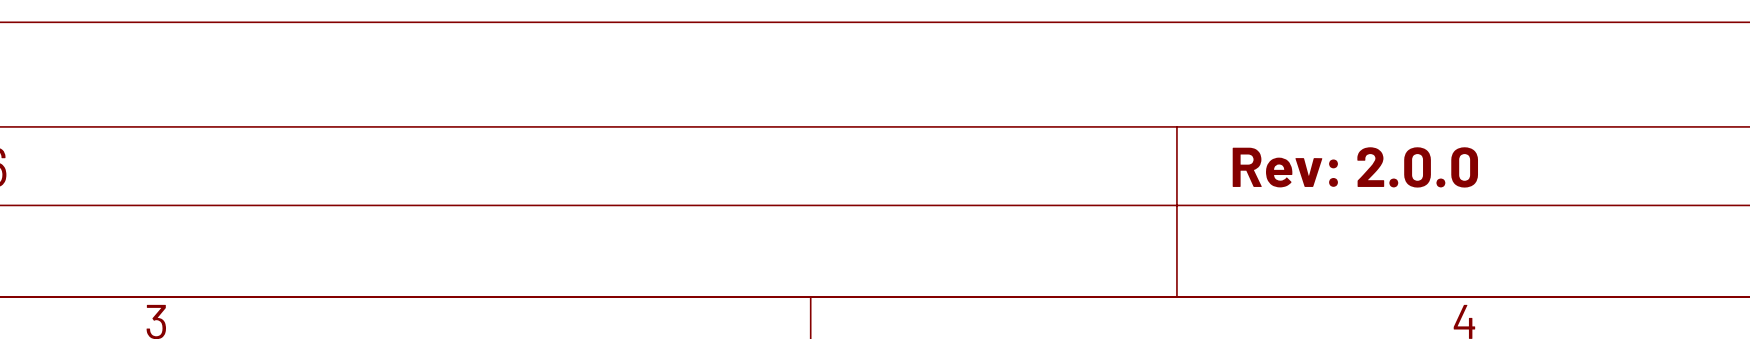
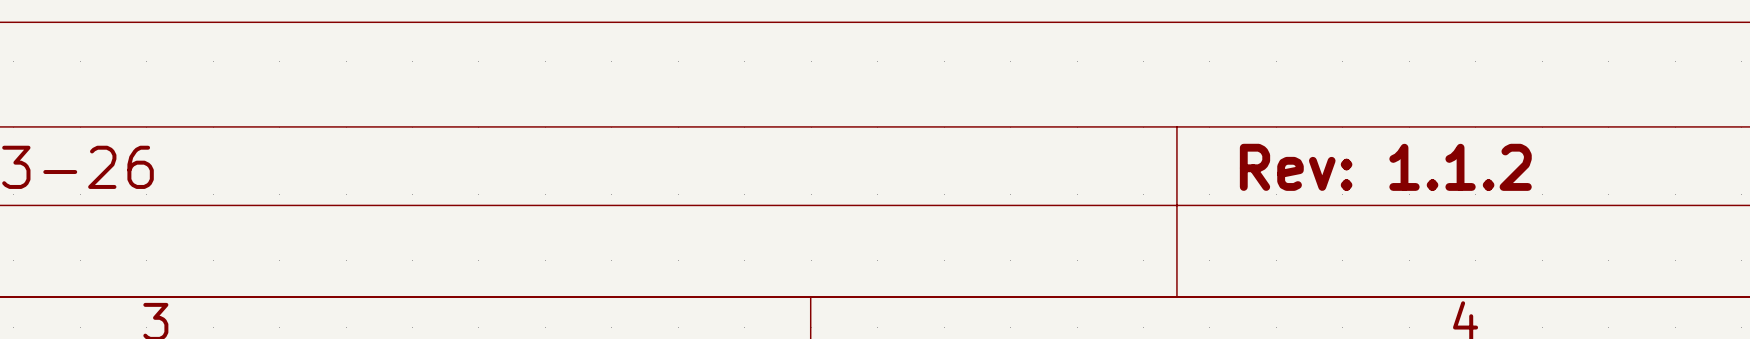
title block: Rev: 2.0.0 (1355, 167) -> Rev: 1.1.2 (1385, 167)

